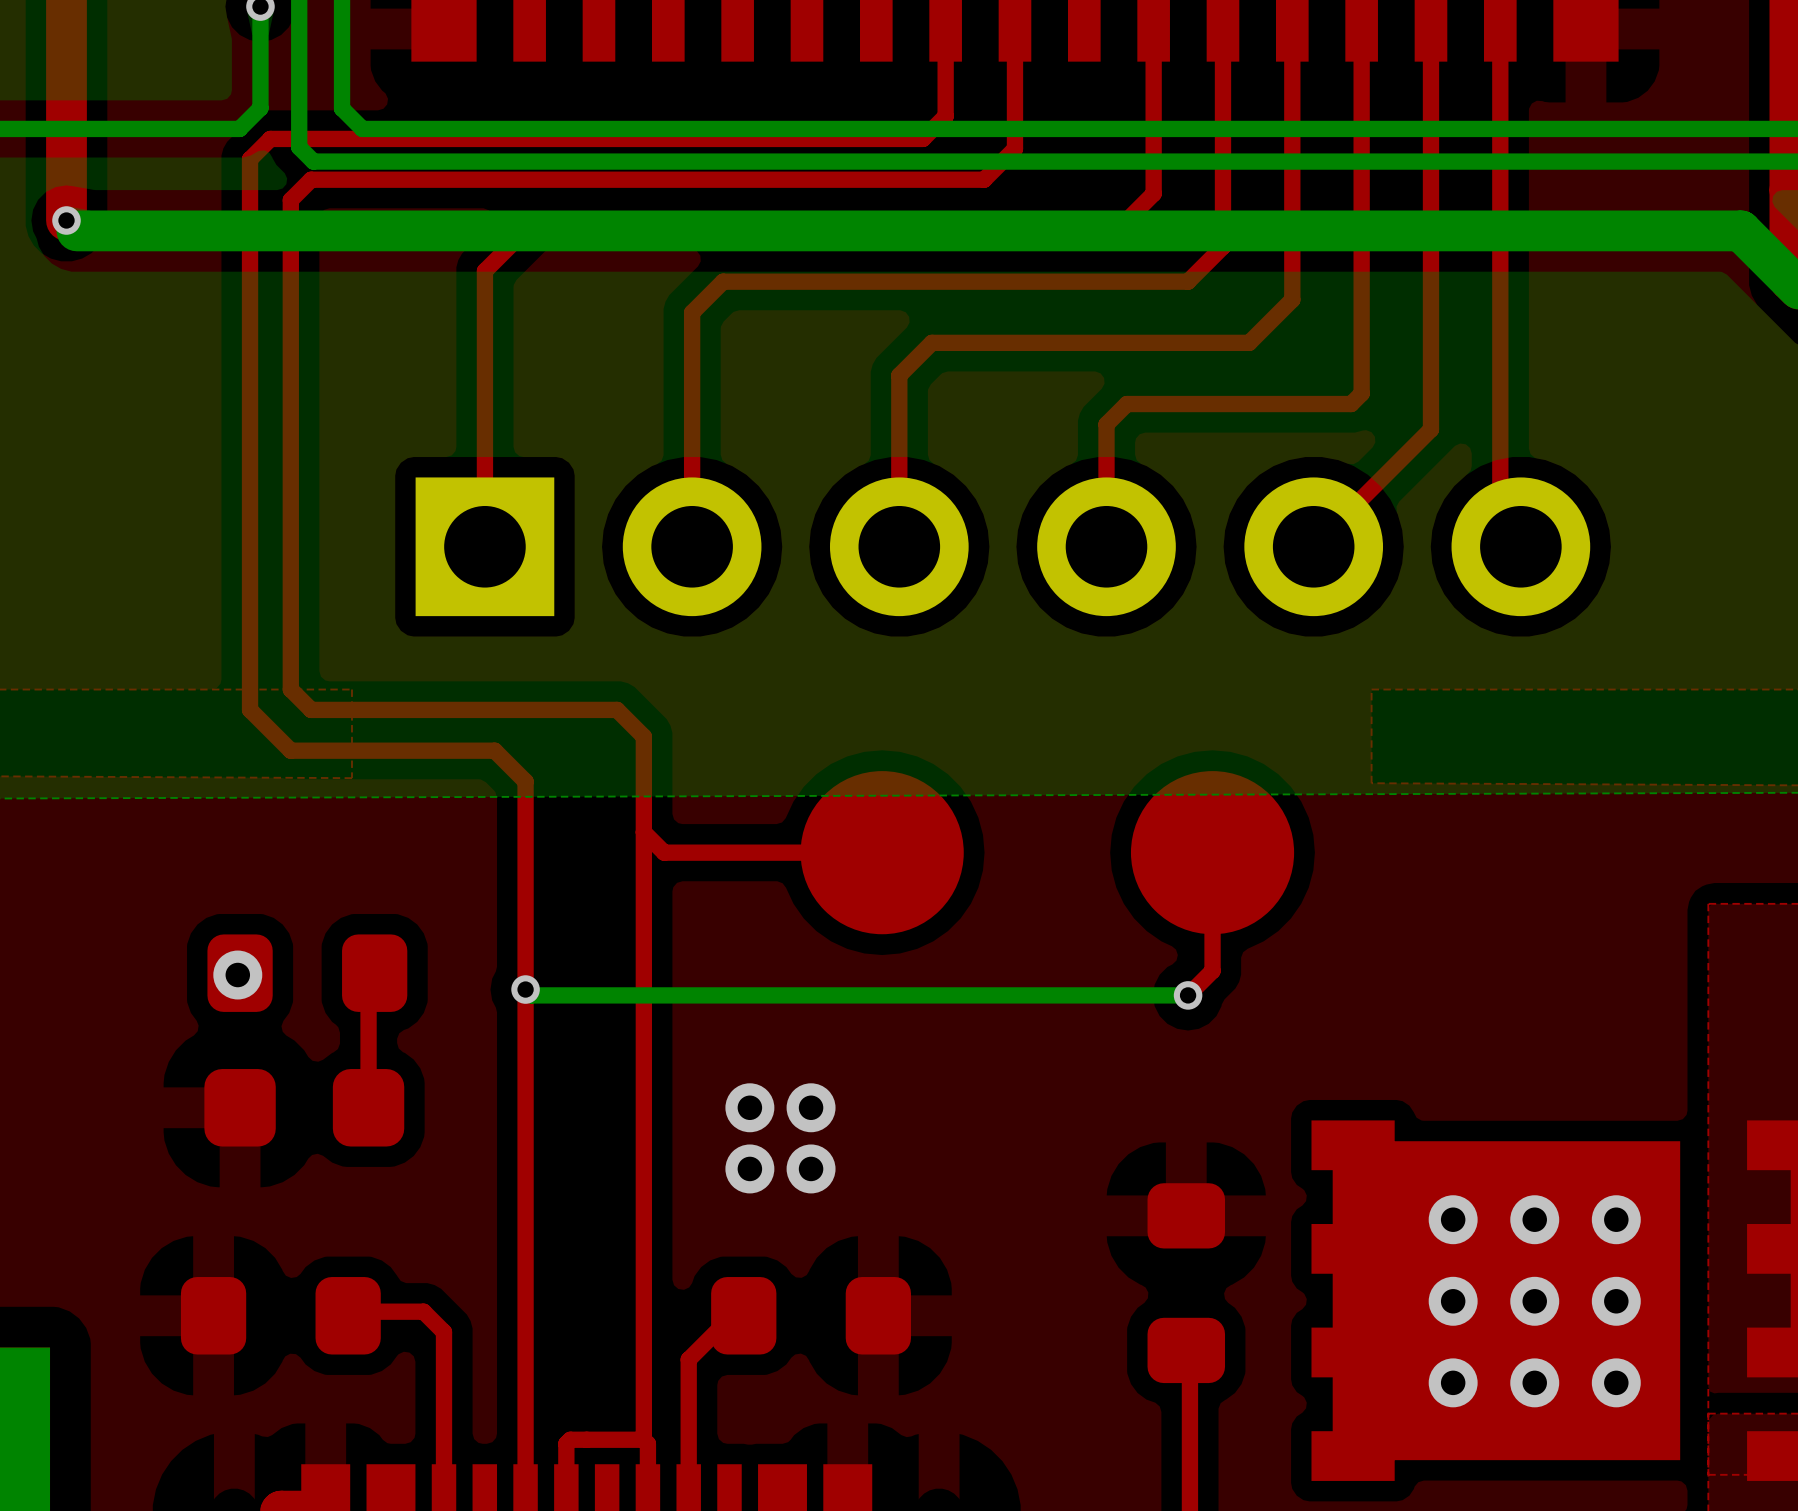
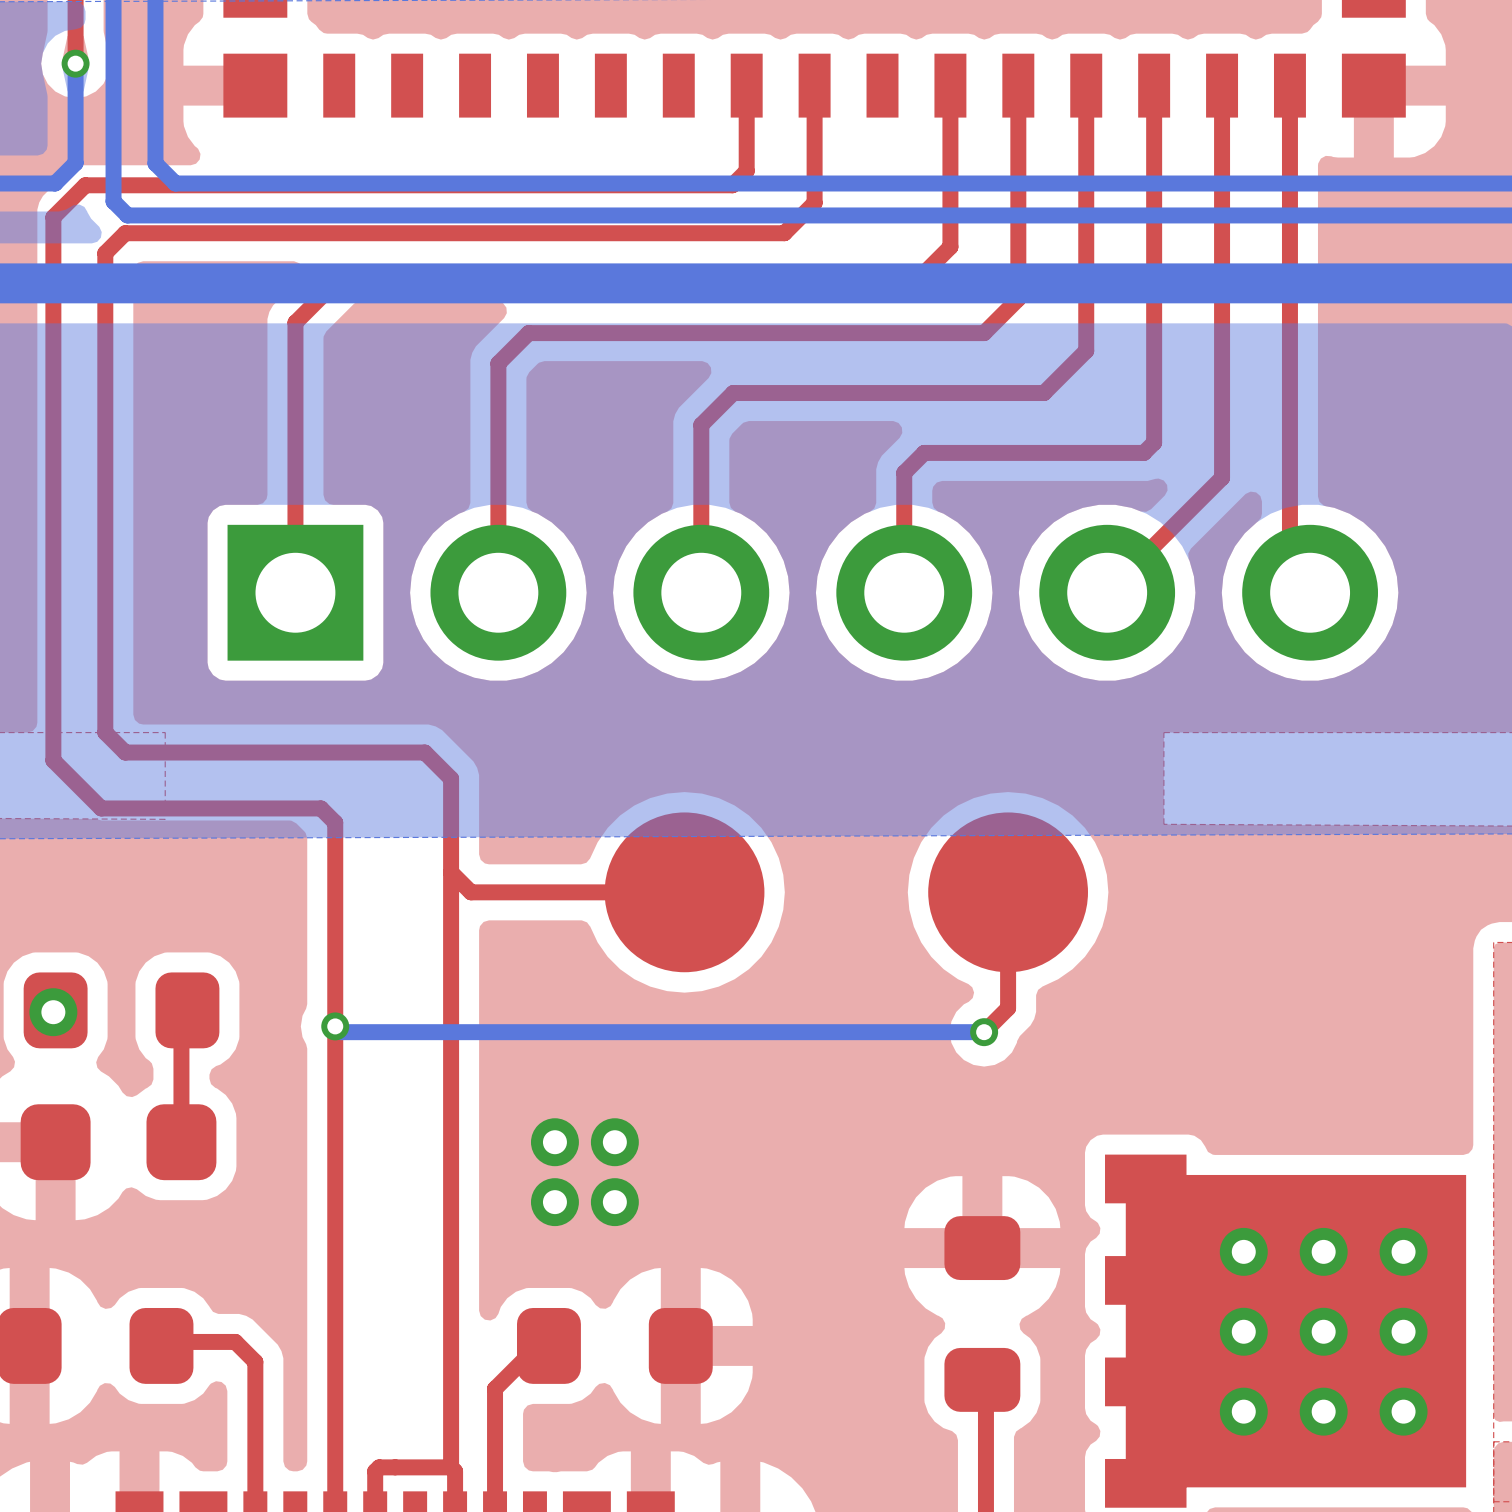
top track: (931, 130) (922, 138) (270, 138) (250, 159) (250, 709) (290, 750) (494, 750) (511, 767) -> (732, 185) (85, 185) (53, 217) (53, 760) (101, 808) (321, 808)

